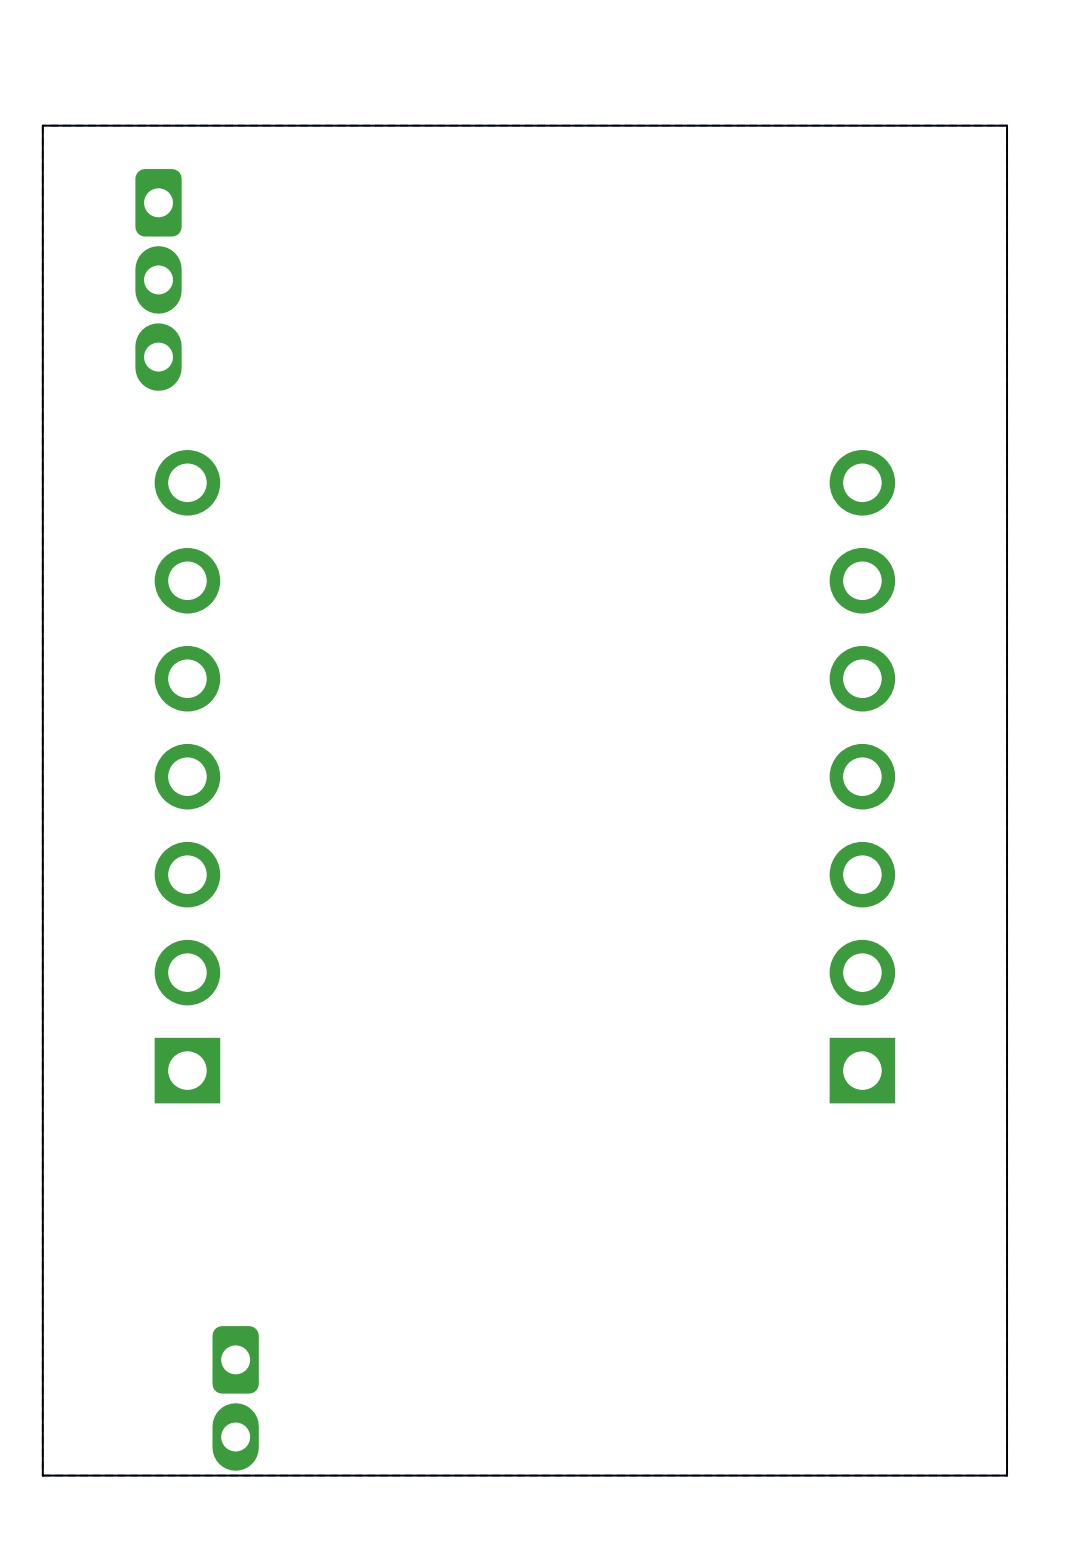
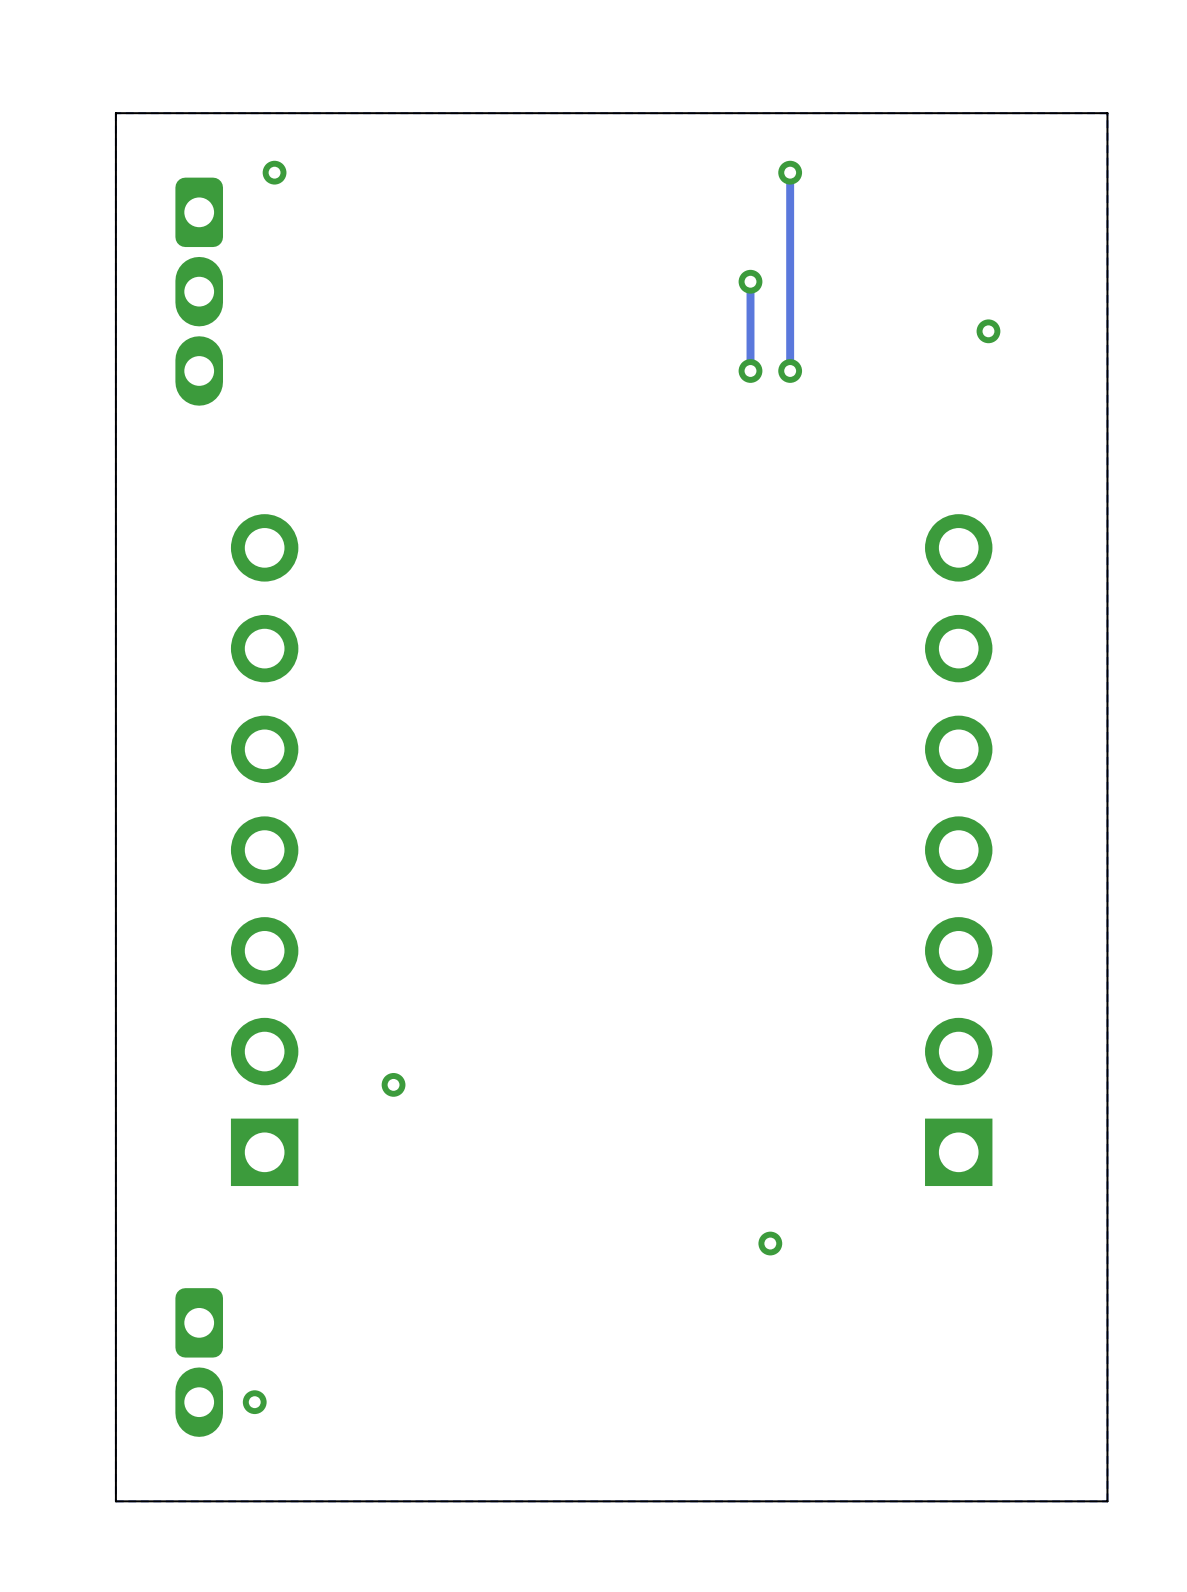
via: none -> (274, 172)
track: none -> (790, 172) (790, 370)
via: none -> (790, 172)
part position: (158, 279) -> (199, 291)
track: none -> (750, 281) (750, 370)
via: none -> (750, 281)
via: none -> (988, 331)
via: none -> (750, 370)
via: none -> (790, 370)
part position: (187, 776) -> (264, 850)
part position: (862, 776) -> (958, 850)
via: none -> (393, 1084)
via: none -> (770, 1243)
via: none -> (254, 1402)
part position: (235, 1398) -> (199, 1362)

